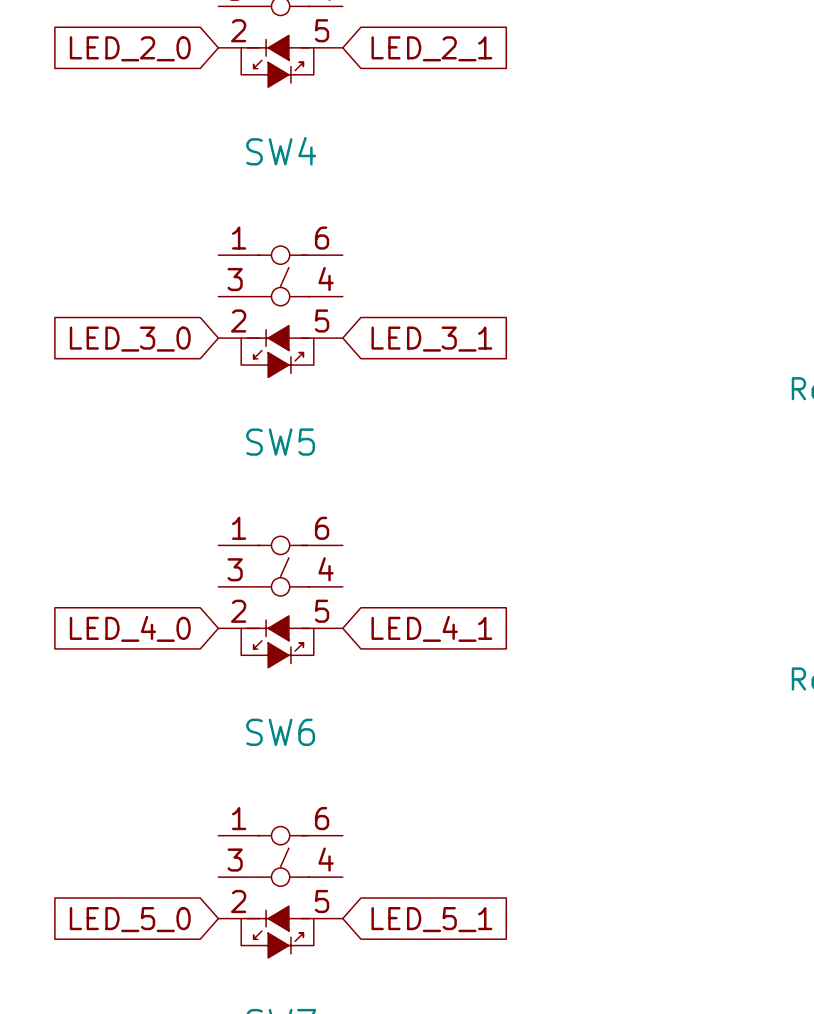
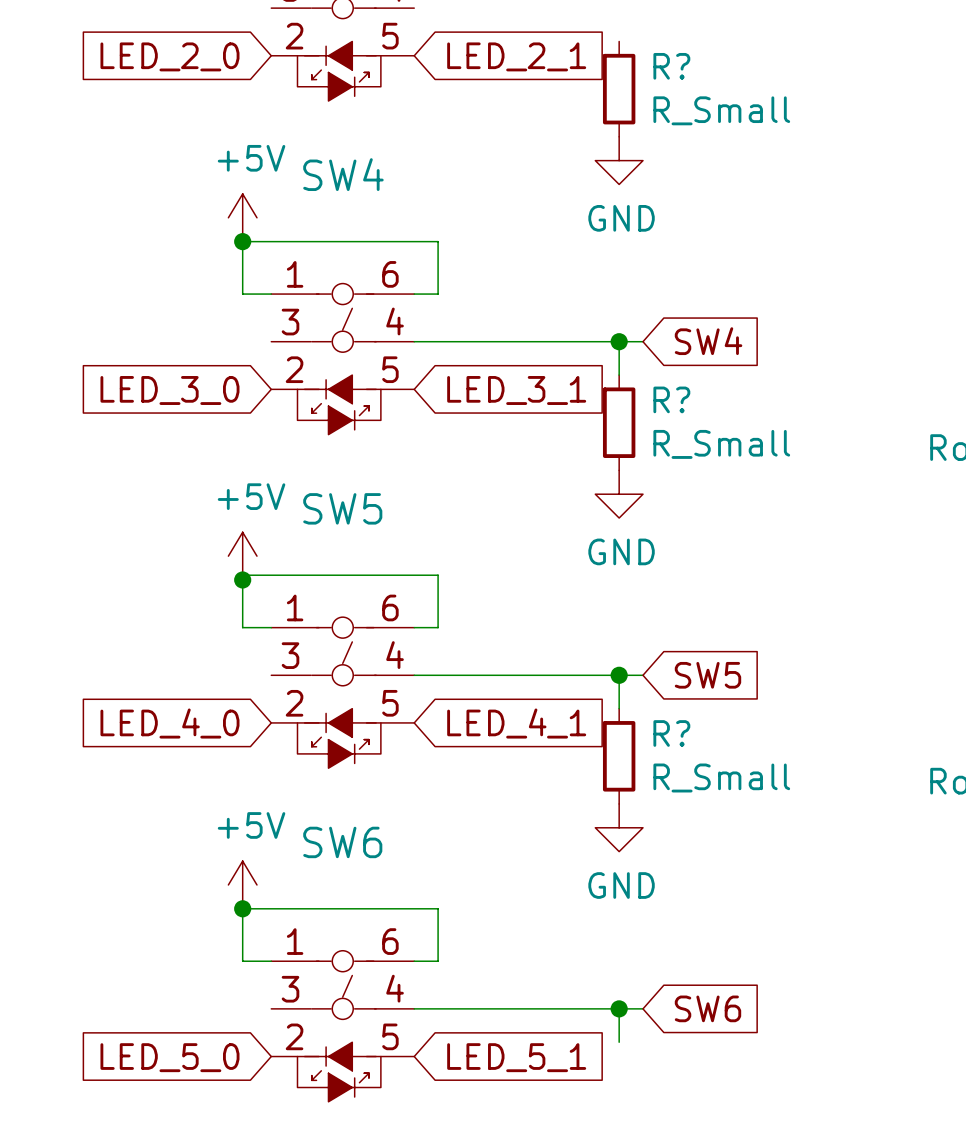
R?: none -> R_Small (619, 89)
power symbol: none -> GND (619, 160)
power symbol: none -> +5V (242, 217)
junction: none -> (242, 241)
wire: none -> (271, 294) (242, 294) (242, 241) (438, 241) (438, 294) (414, 294)
wire: none -> (414, 341) (642, 341)
wire: none -> (619, 341) (619, 375)
junction: none -> (619, 341)
global label: none -> SW4 (708, 341)
R?: none -> R_Small (619, 422)
power symbol: none -> GND (619, 494)
power symbol: none -> +5V (242, 556)
junction: none -> (242, 579)
wire: none -> (271, 627) (242, 627) (242, 575) (438, 575) (438, 627) (414, 627)
wire: none -> (414, 675) (642, 675)
wire: none -> (619, 675) (619, 708)
junction: none -> (619, 675)
global label: none -> SW5 (707, 675)
R?: none -> R_Small (619, 756)
power symbol: none -> GND (619, 827)
power symbol: none -> +5V (242, 884)
junction: none -> (242, 908)
wire: none -> (271, 961) (242, 961) (242, 908) (438, 908) (438, 961) (414, 961)
wire: none -> (414, 1008) (642, 1008)
wire: none -> (619, 1008) (619, 1042)
junction: none -> (619, 1008)
global label: none -> SW6 (707, 1008)

